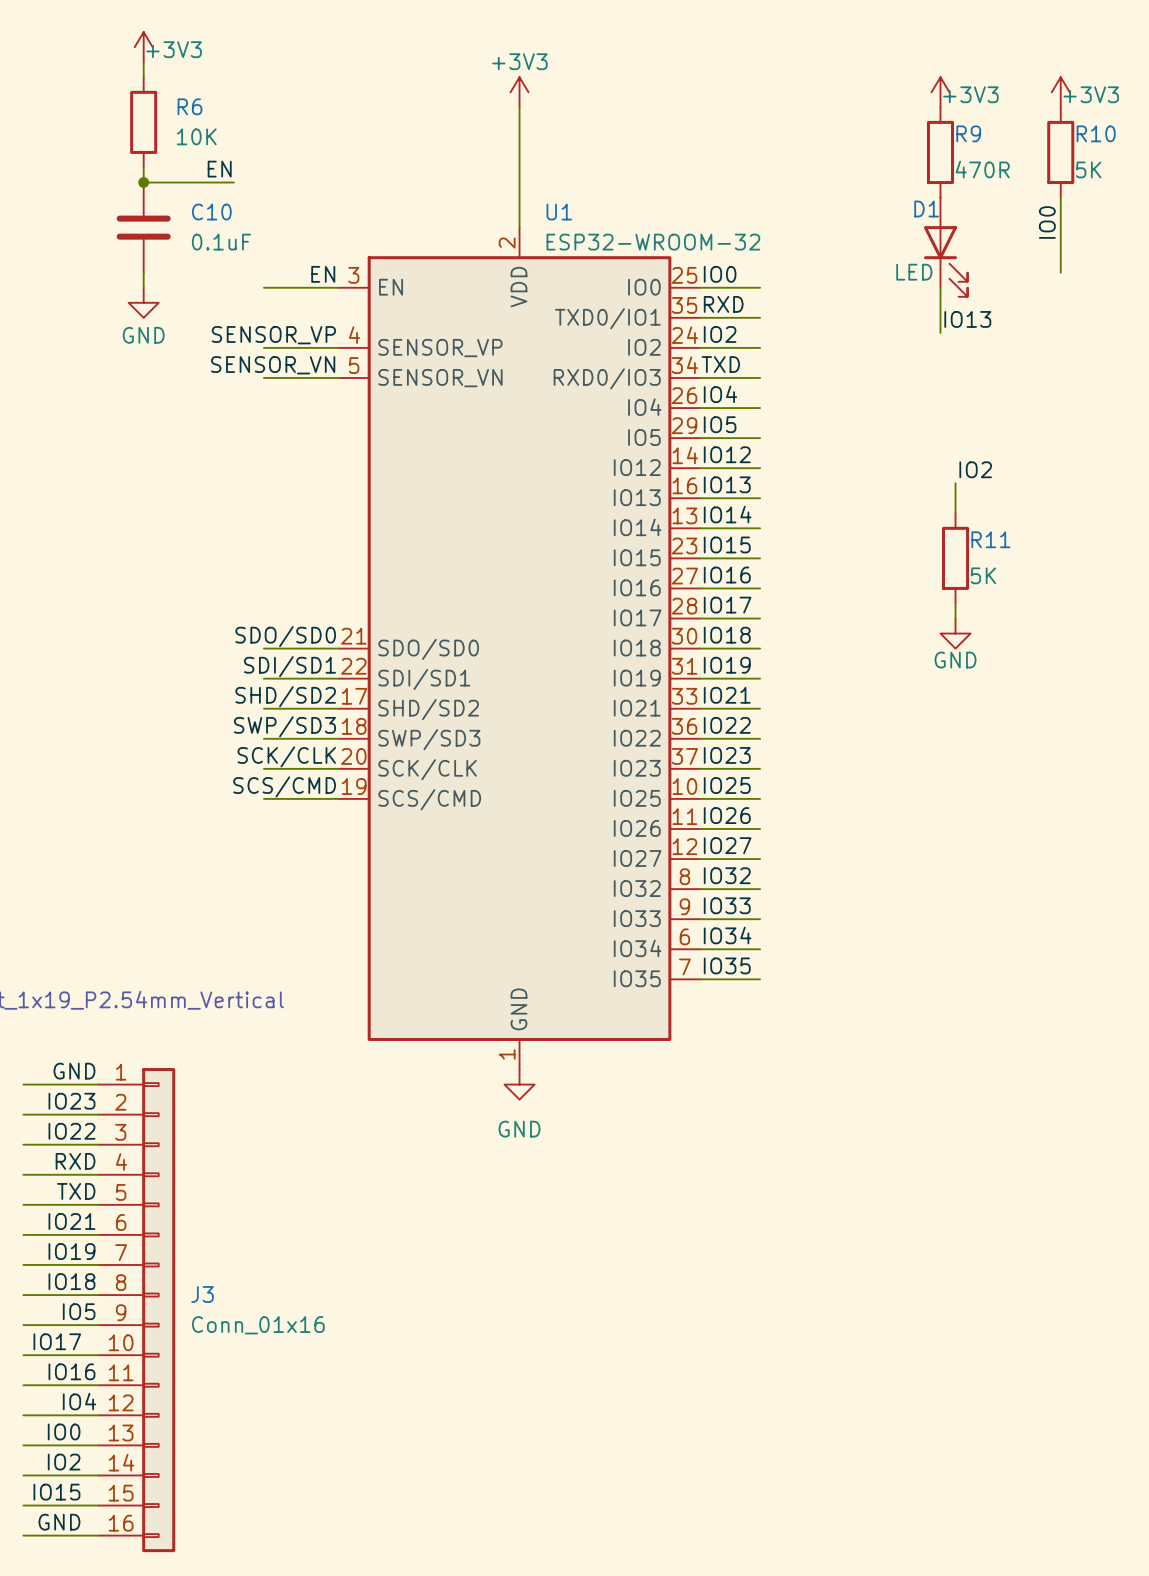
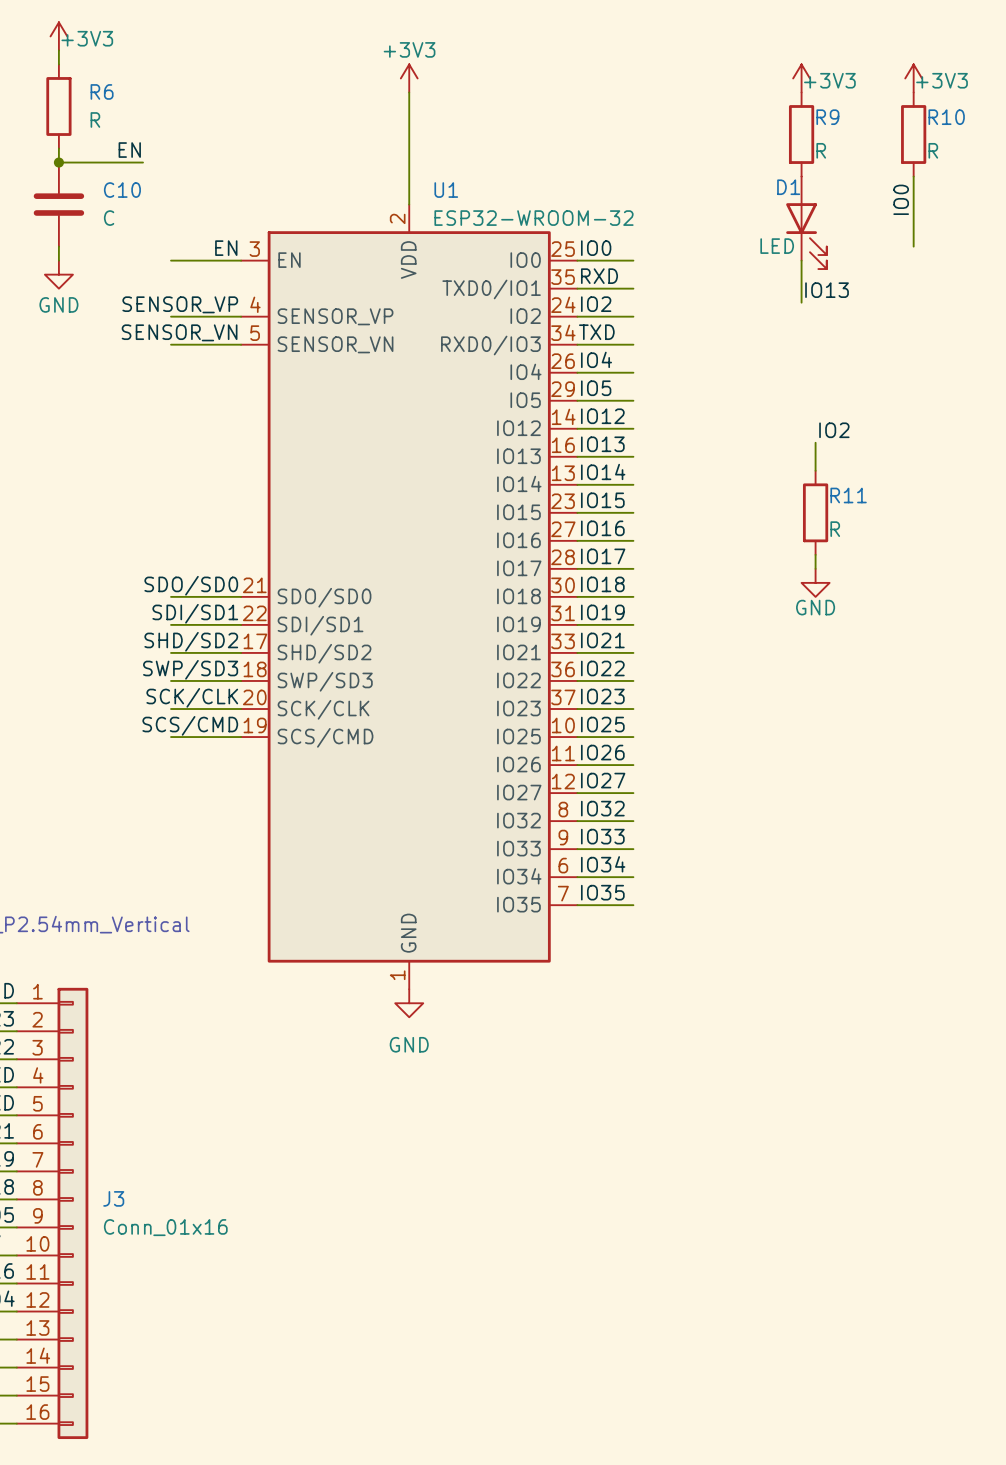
R6 value: 10K (196, 136) -> R (95, 119)
R9 value: 470R (982, 169) -> R (821, 150)
R10 value: 5K (1088, 169) -> R (933, 150)
C10 value: 0.1uF (221, 242) -> C (109, 218)
R11 value: 5K (983, 575) -> R (835, 529)

